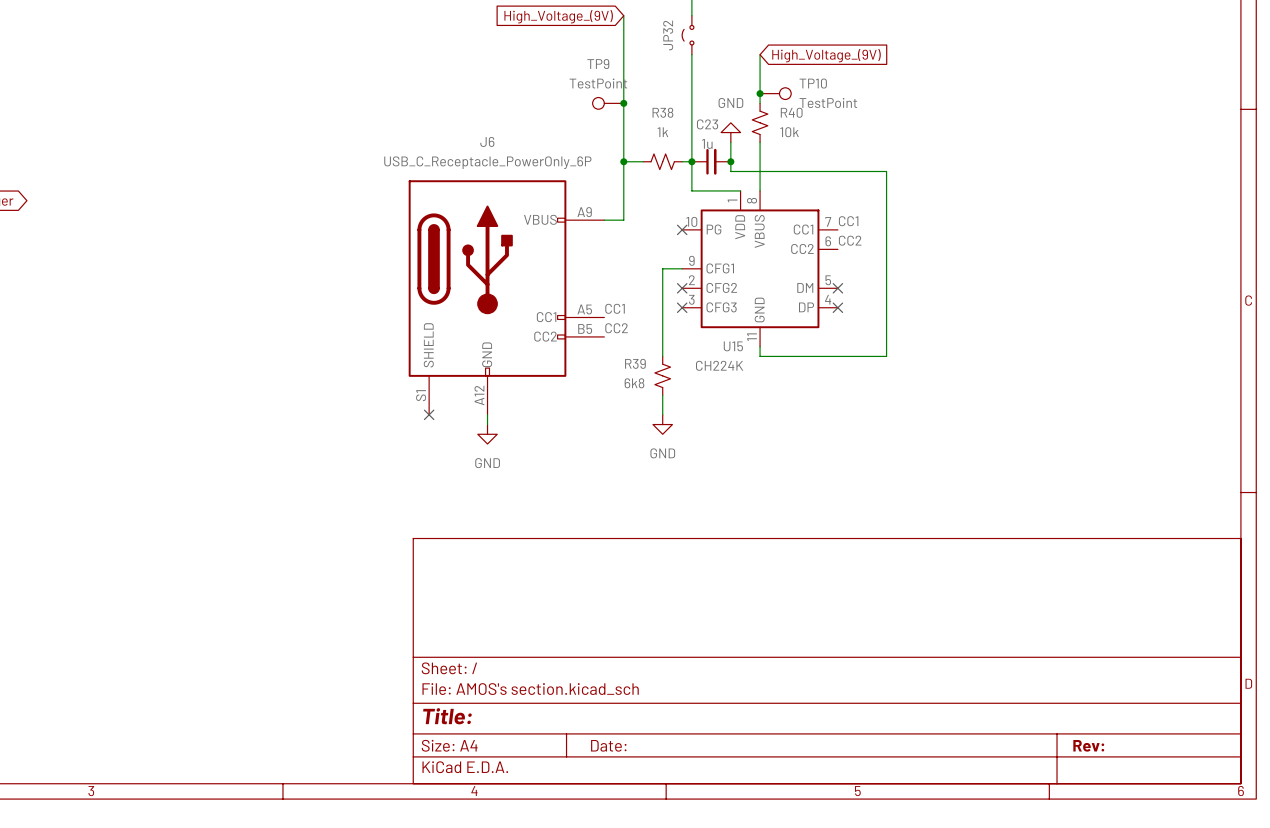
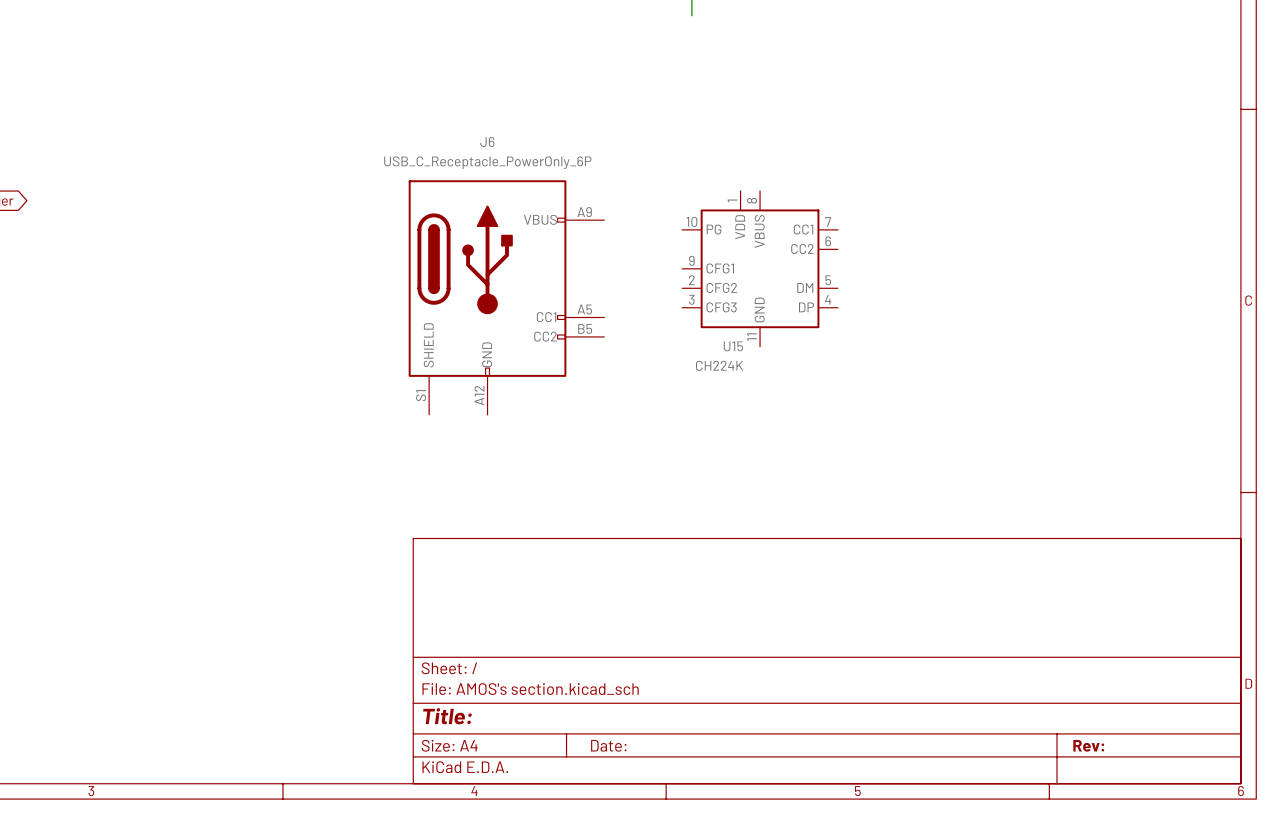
wire: (623, 15) (623, 220) (604, 220) -> none
global label: High_Voltage_(9V) (558, 16) -> none
JP32: (688, 35) -> none
wire: (691, 54) (691, 190) (740, 190) -> none
wire: (760, 54) (760, 103) -> none
global label: High_Voltage_(9V) (826, 55) -> none
junction: (760, 93) -> none
TP10: TestPoint (775, 93) -> none
TP9: TestPoint (608, 103) -> none
junction: (623, 103) -> none
R40: 10k (760, 122) -> none
power symbol: GND (730, 132) -> none
wire: (730, 142) (730, 171) (886, 171) (886, 356) (760, 356) (760, 346) -> none
wire: (760, 142) (760, 190) -> none
wire: (623, 161) (643, 161) -> none
junction: (623, 161) -> none
R38: 1k (662, 161) -> none
wire: (682, 161) (691, 161) -> none
junction: (691, 161) -> none
C23: 1u (711, 161) -> none
junction: (730, 161) -> none
label: CC1 (848, 221) -> none
no-connect mark: (682, 229) -> none
label: CC2 (850, 240) -> none
wire: (682, 268) (662, 268) (662, 356) -> none
no-connect mark: (682, 288) -> none
no-connect mark: (837, 288) -> none
no-connect mark: (682, 307) -> none
no-connect mark: (837, 307) -> none
label: CC1 (615, 308) -> none
label: CC2 (616, 328) -> none
R39: 6k8 (662, 375) -> none
wire: (662, 395) (662, 414) -> none
no-connect mark: (429, 414) -> none
wire: (487, 414) (487, 424) -> none
power symbol: GND (662, 424) -> none
power symbol: GND (487, 434) -> none

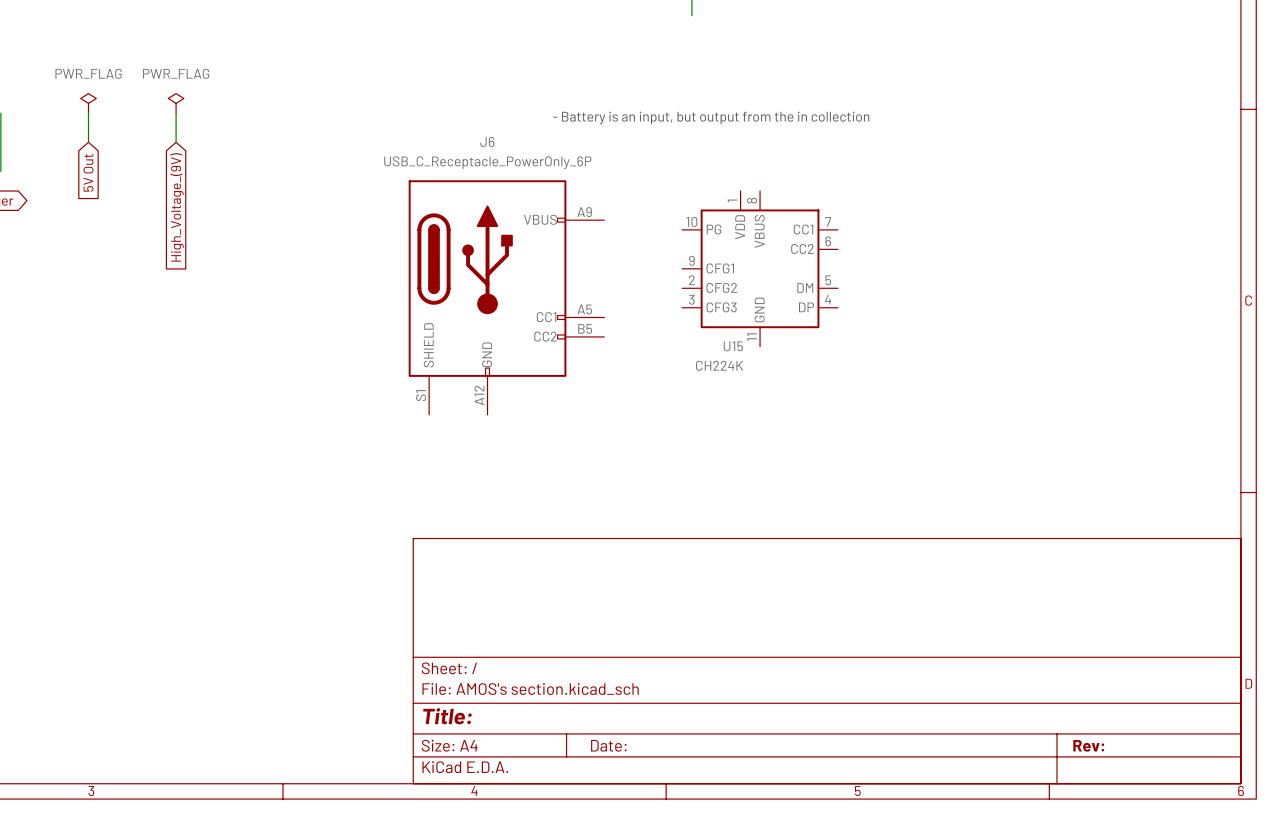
power symbol: none -> PWR_FLAG (88, 103)
power symbol: none -> PWR_FLAG (176, 103)
wire: none -> (0, 113) (0, 171)
wire: none -> (88, 113) (88, 142)
wire: none -> (176, 113) (176, 142)
text: none -> - Battery is an input, but output from the in collection (711, 117)
global label: none -> 5V Out (88, 172)
global label: none -> High_Voltage_(9V) (177, 207)

